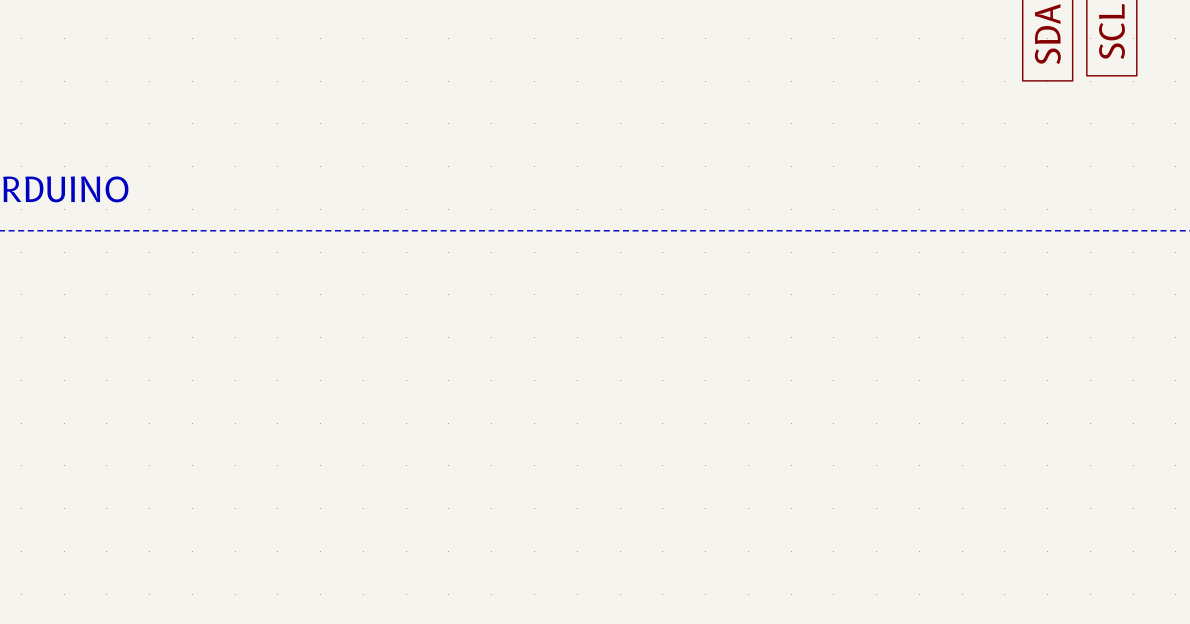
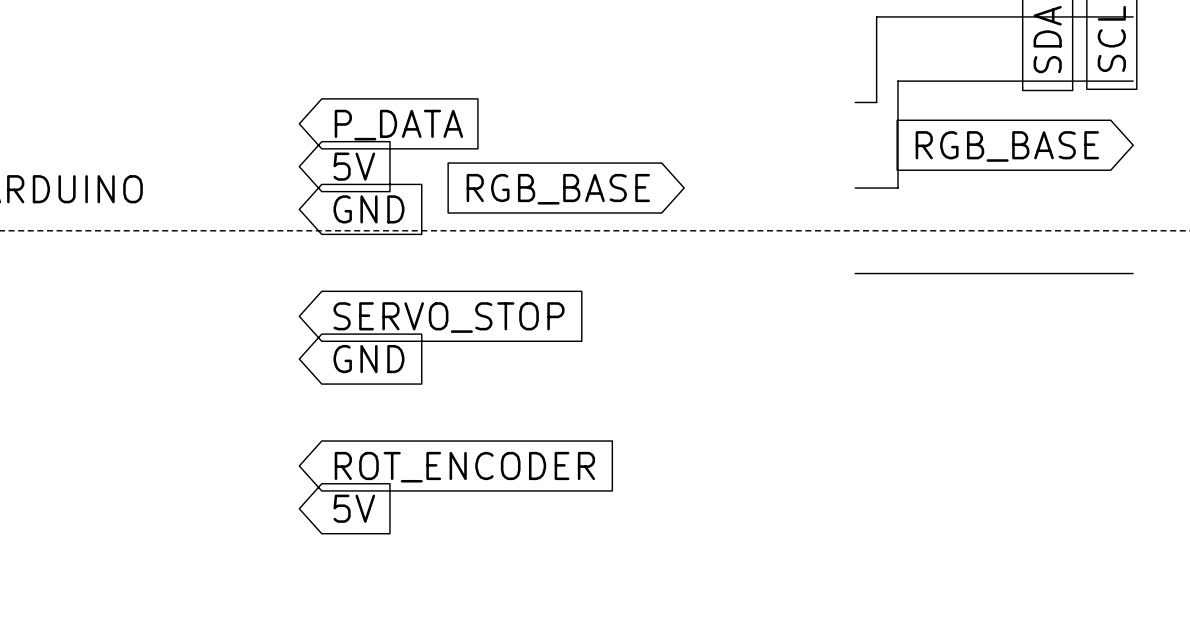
wire: none -> (1133, 16) (876, 16) (876, 102) (855, 102)
wire: none -> (1133, 81) (898, 81) (898, 188) (855, 188)
global label: none -> P_DATA (398, 125)
global label: none -> RGB_BASE (1007, 146)
global label: none -> 5V (354, 166)
global label: none -> RGB_BASE (558, 189)
global label: none -> GND (368, 209)
wire: none -> (855, 273) (1133, 273)
global label: none -> SERVO_STOP (449, 317)
global label: none -> GND (368, 359)
global label: none -> ROT_ENCODER (464, 467)
global label: none -> 5V (354, 508)

